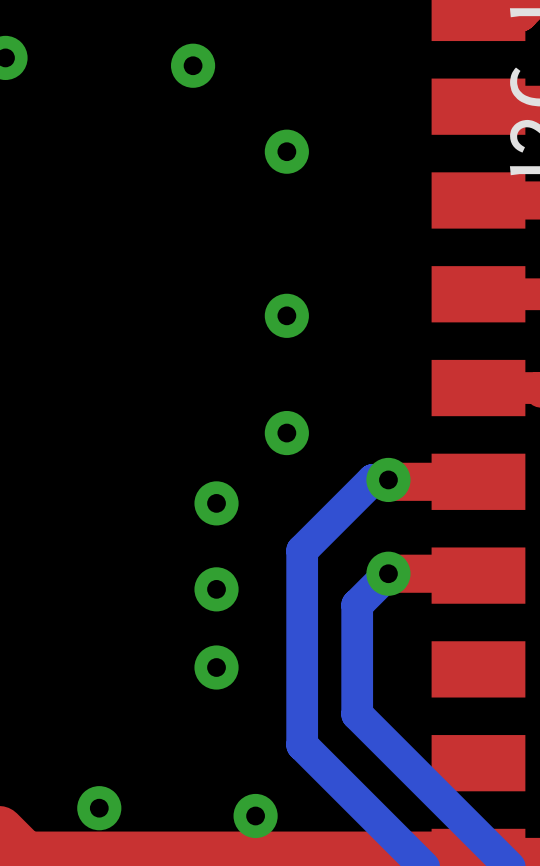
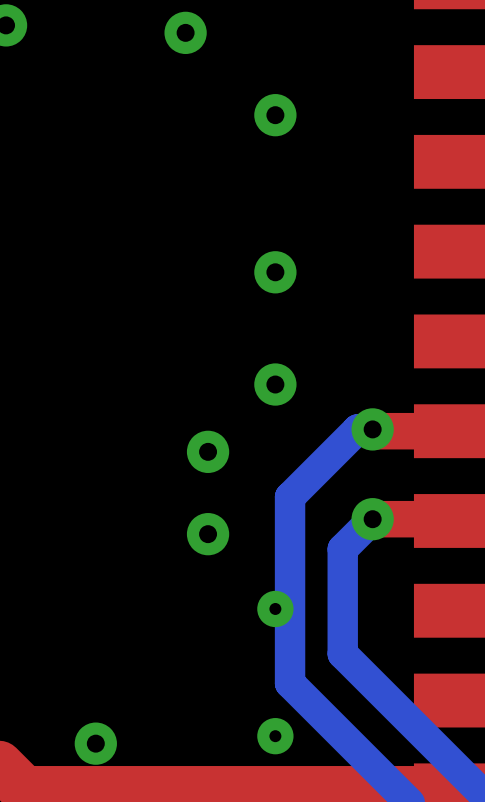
via: (216, 667) -> none
via: none -> (275, 608)
via position: (255, 816) -> (275, 736)

